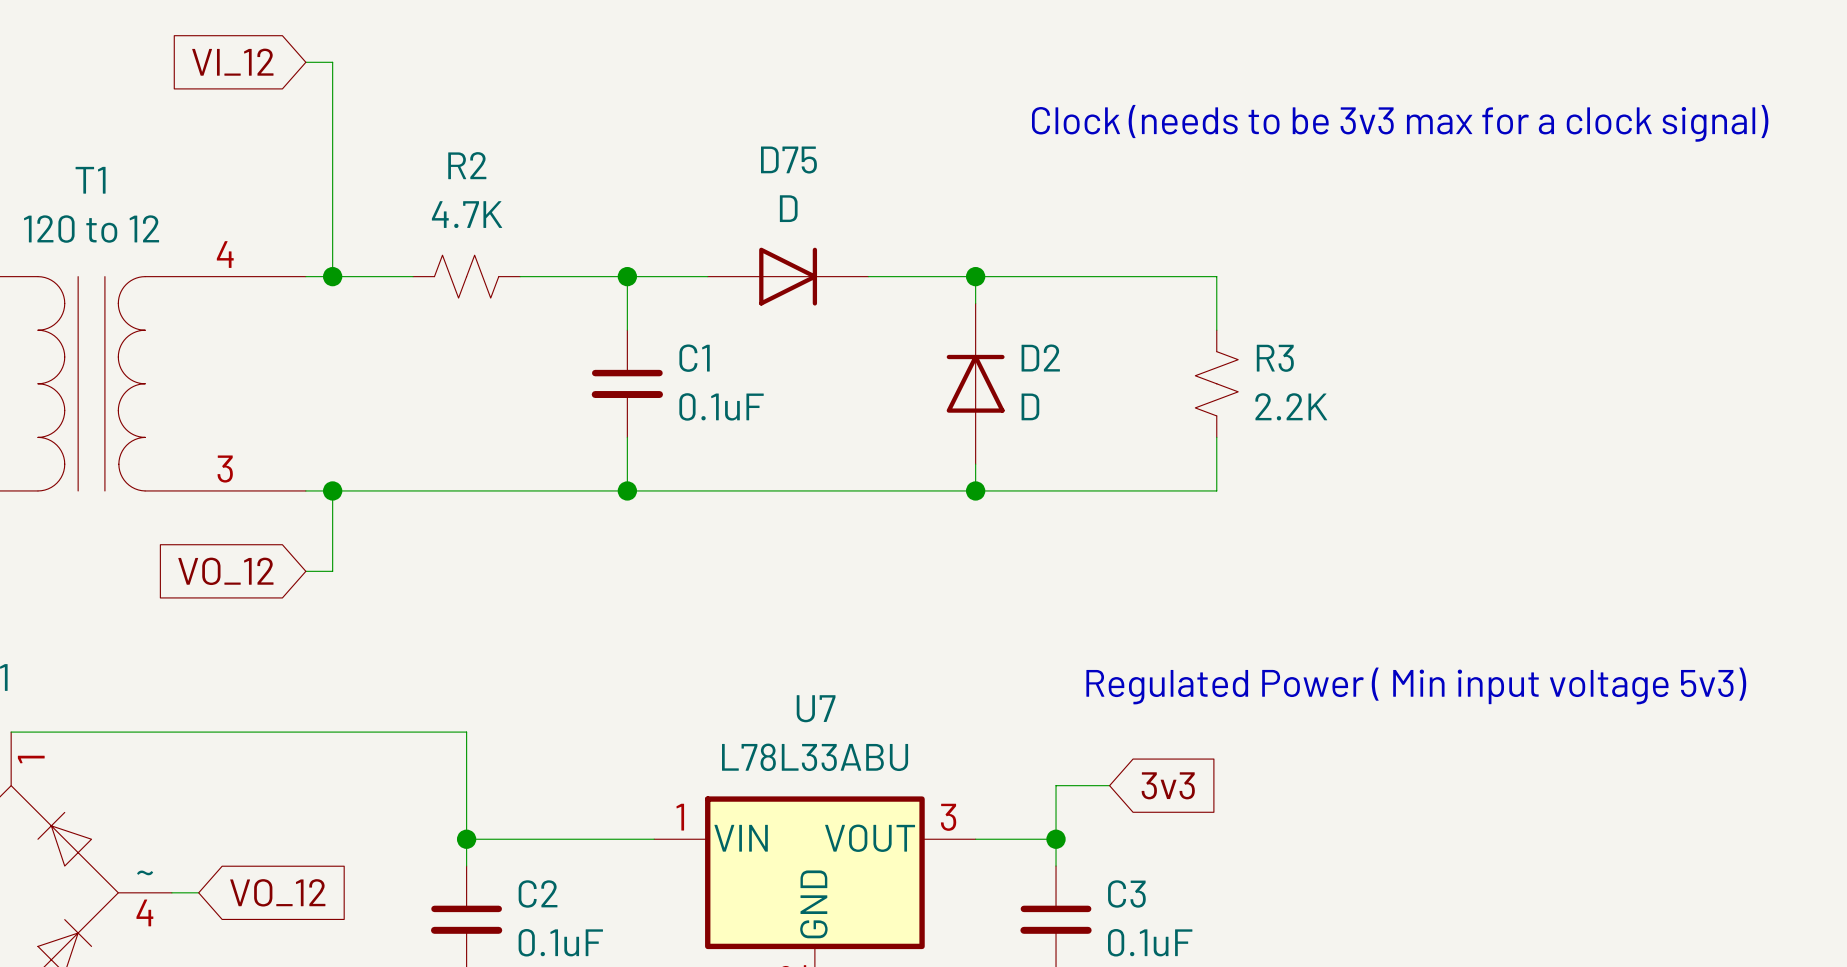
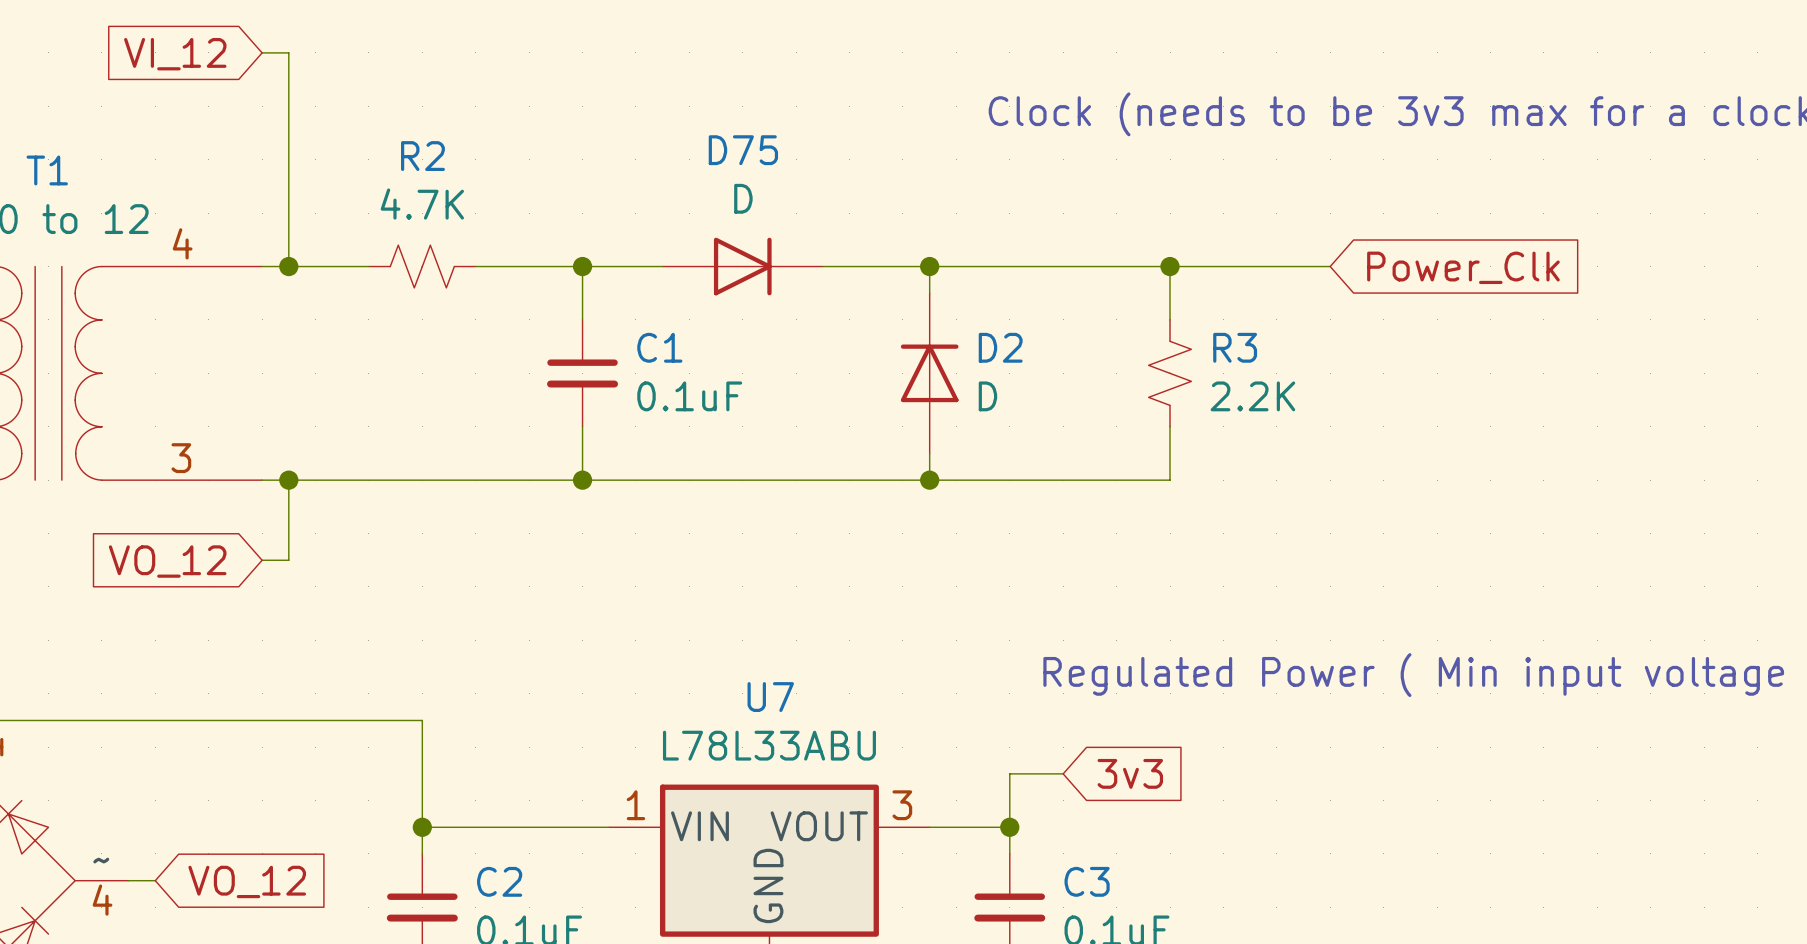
wire: none -> (1170, 266) (1330, 266)
junction: none -> (1170, 266)
global label: none -> Power_Clk (1463, 267)

